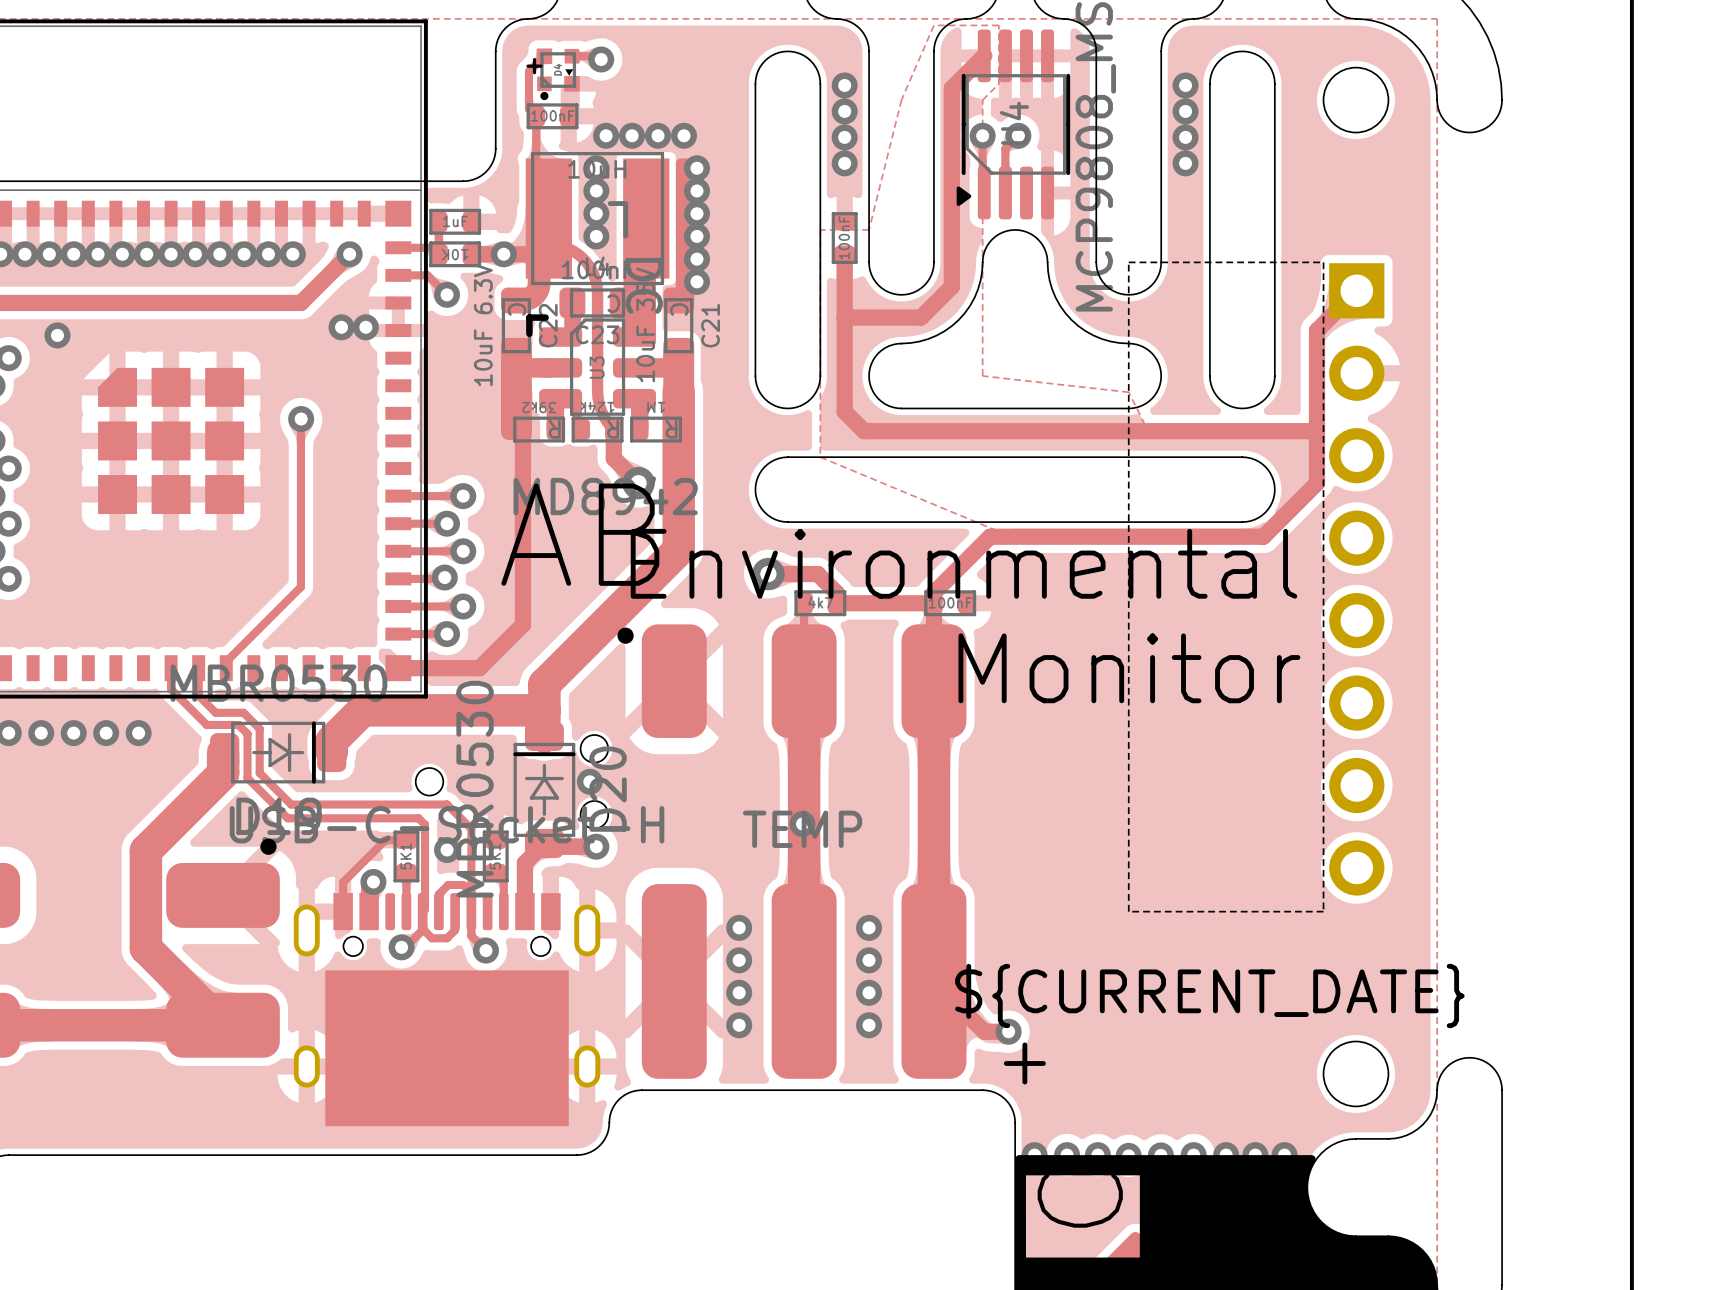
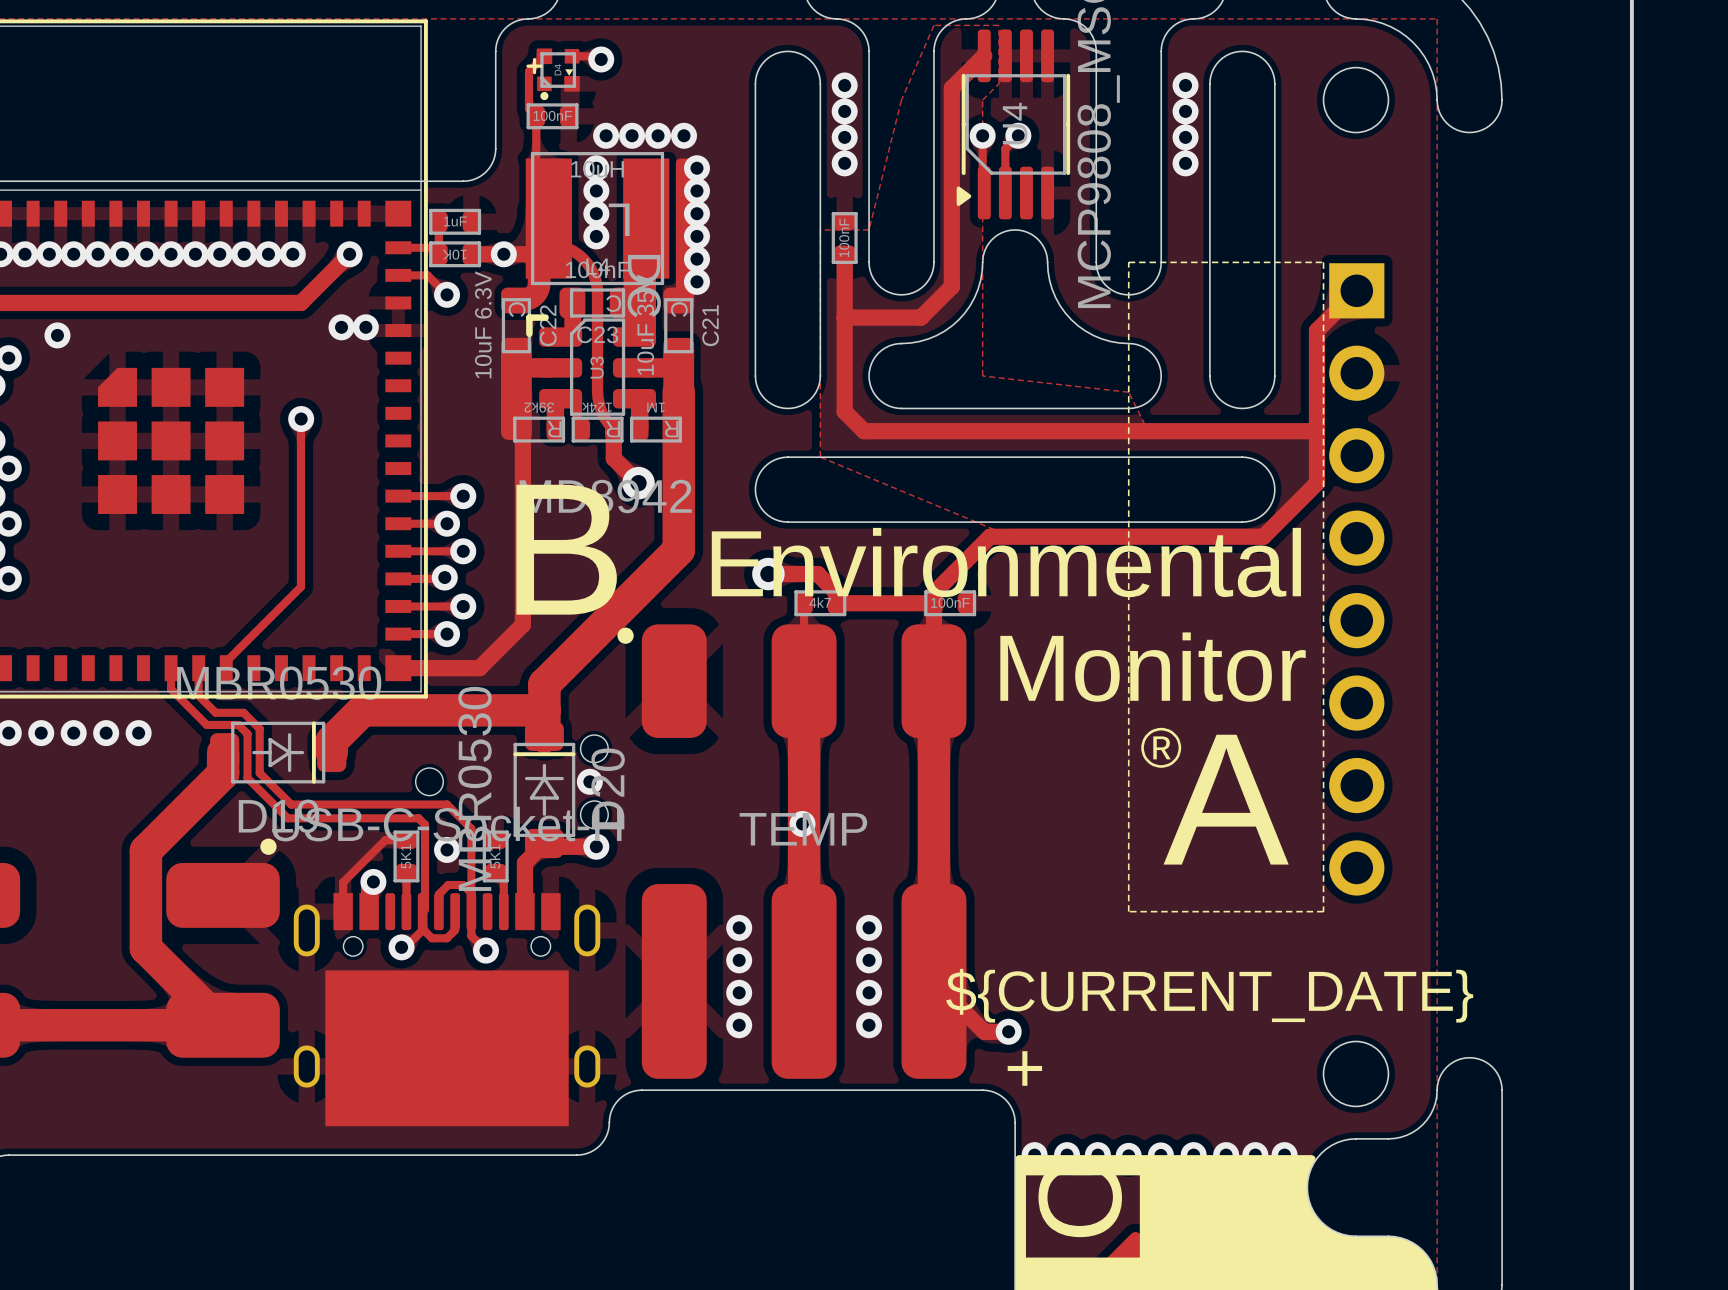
text: AB (580, 534) -> B (566, 549)
text: none -> ® (1161, 747)
text: none -> A (1226, 799)

